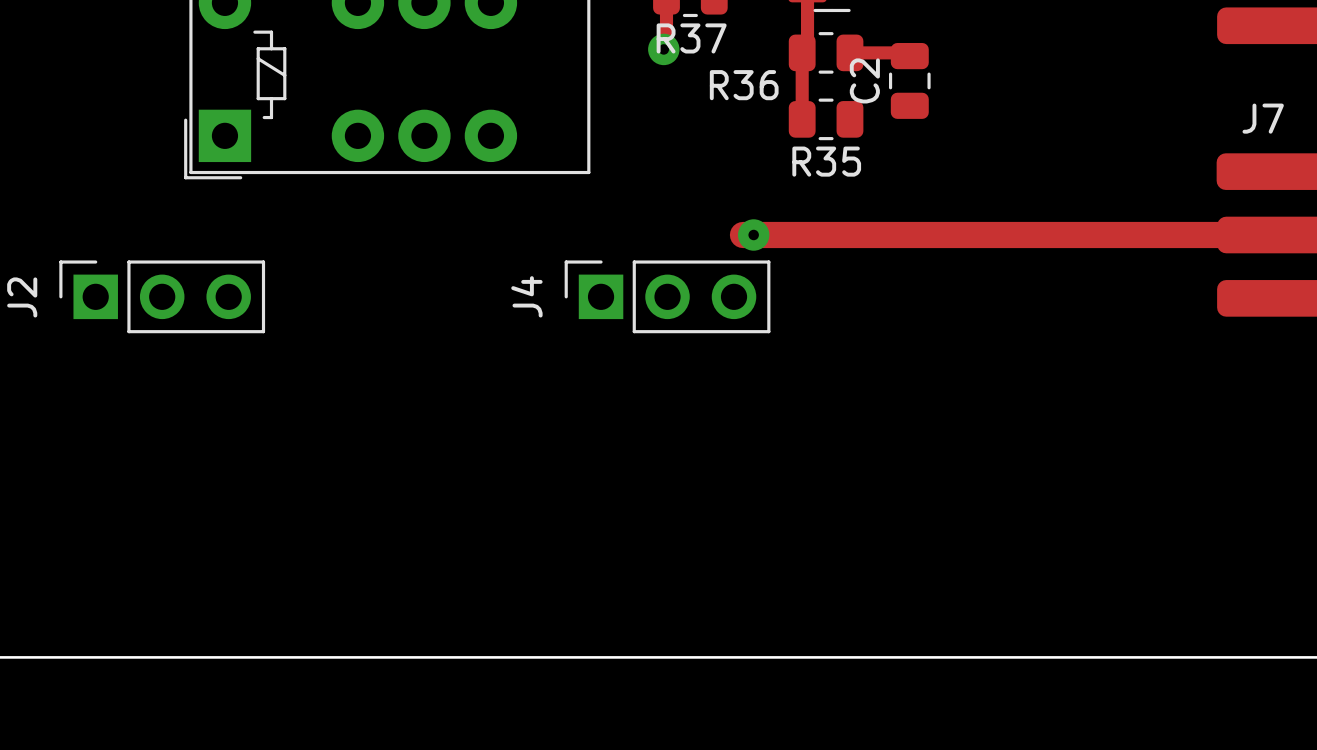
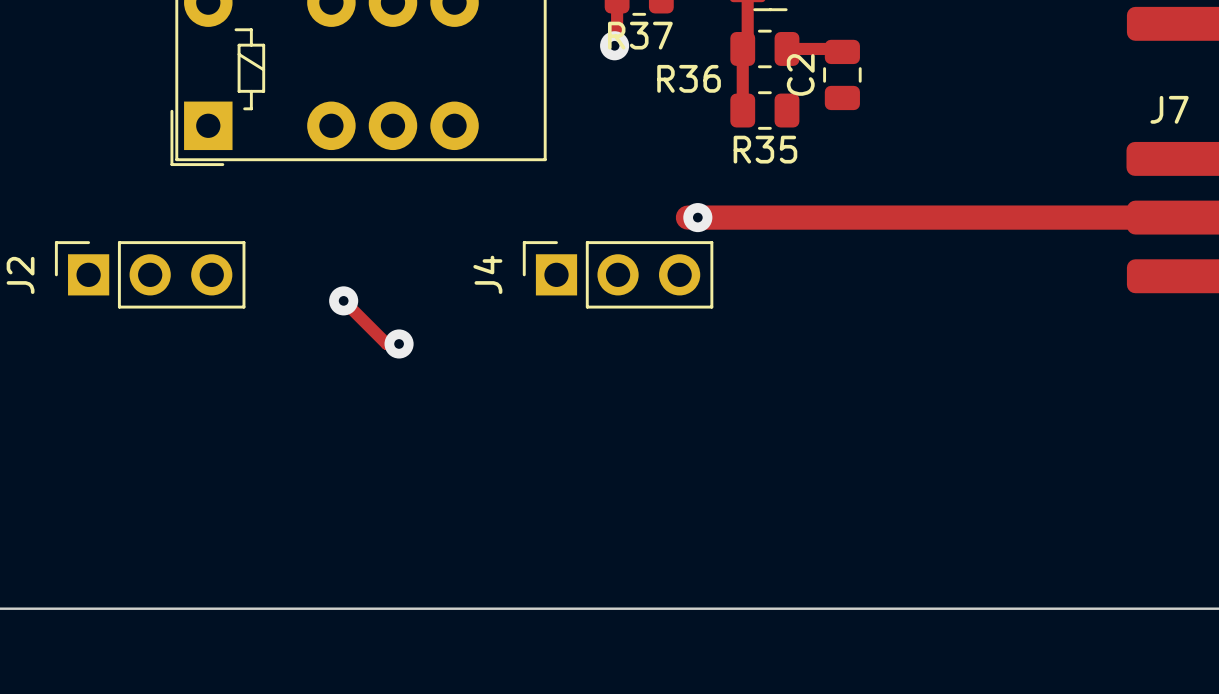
track: none -> (343, 300) (386, 343) (399, 343)
via: none -> (343, 300)
via: none -> (399, 343)

